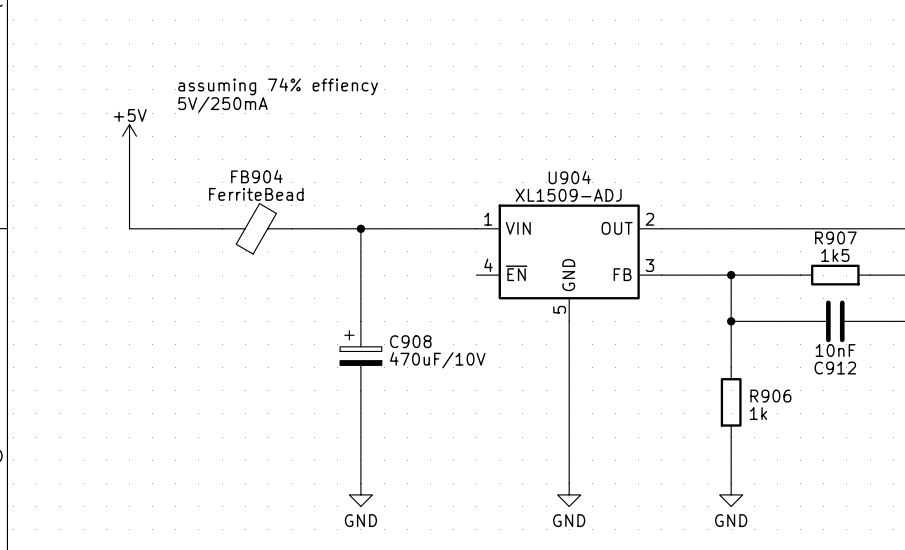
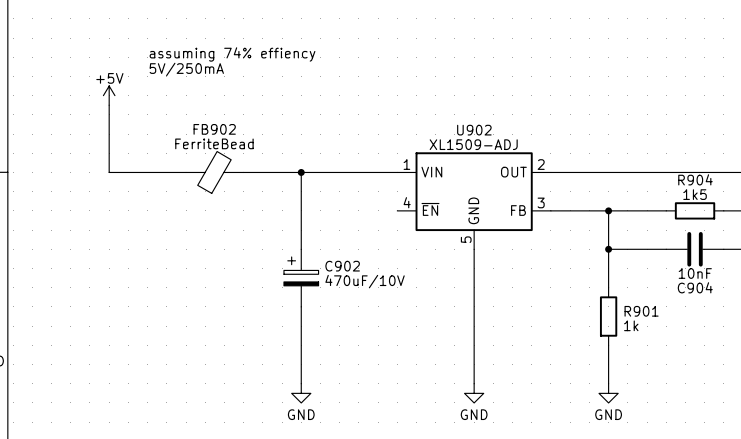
FB904 name: FB904 (256, 176) -> FB902 (214, 129)
U904 name: U904 (569, 177) -> U902 (474, 130)
R907 name: R907 (835, 237) -> R904 (695, 179)
C908 name: C908 (410, 341) -> C902 (342, 266)
C912 name: C912 (835, 368) -> C904 (695, 287)
R906 name: R906 (770, 396) -> R901 (641, 311)

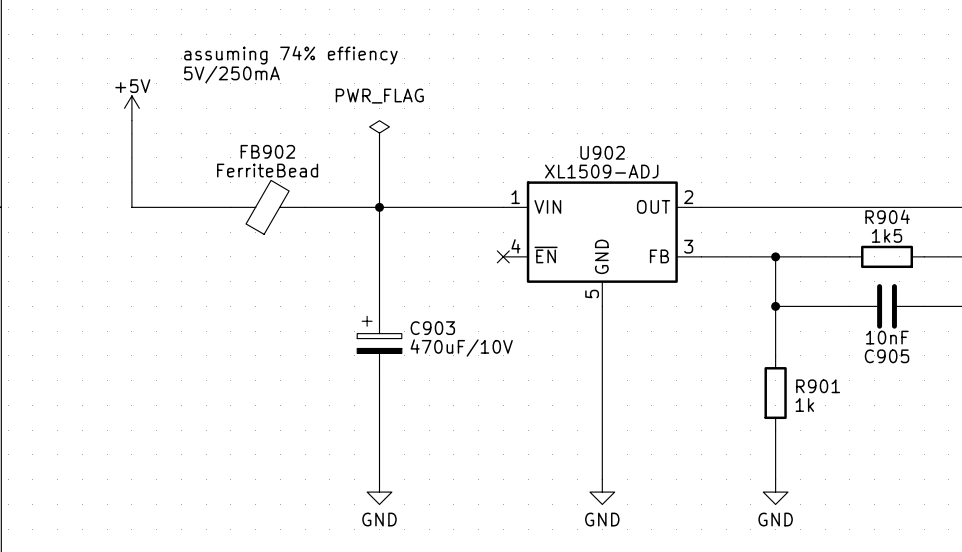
power symbol: none -> PWR_FLAG (379, 133)
wire: none -> (379, 145) (379, 207)
no-connect mark: none -> (503, 256)
C902 name: C902 (342, 266) -> C903 (432, 328)
C904 name: C904 (695, 287) -> C905 (887, 356)

